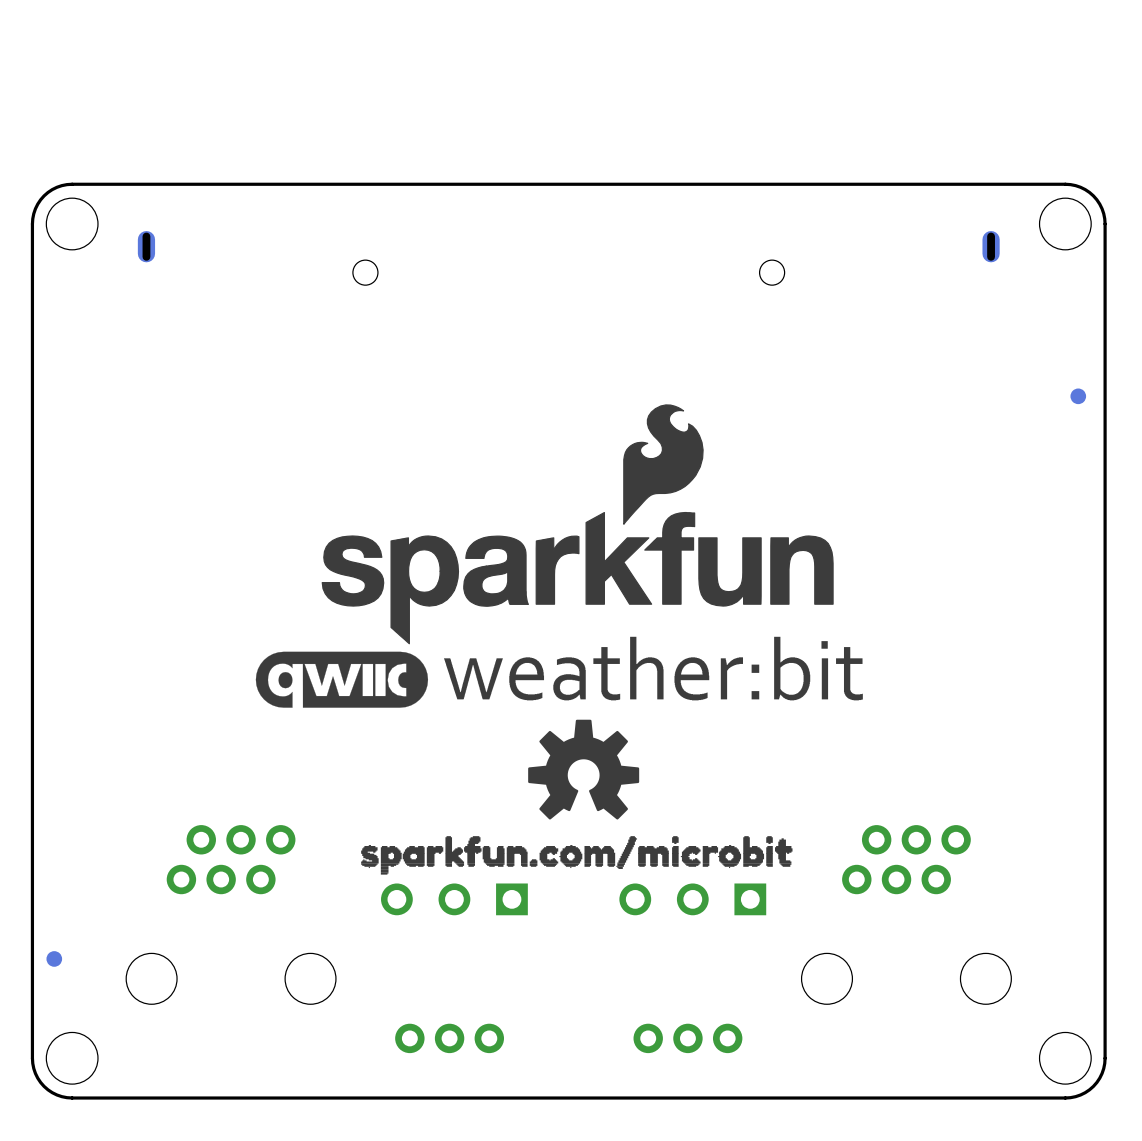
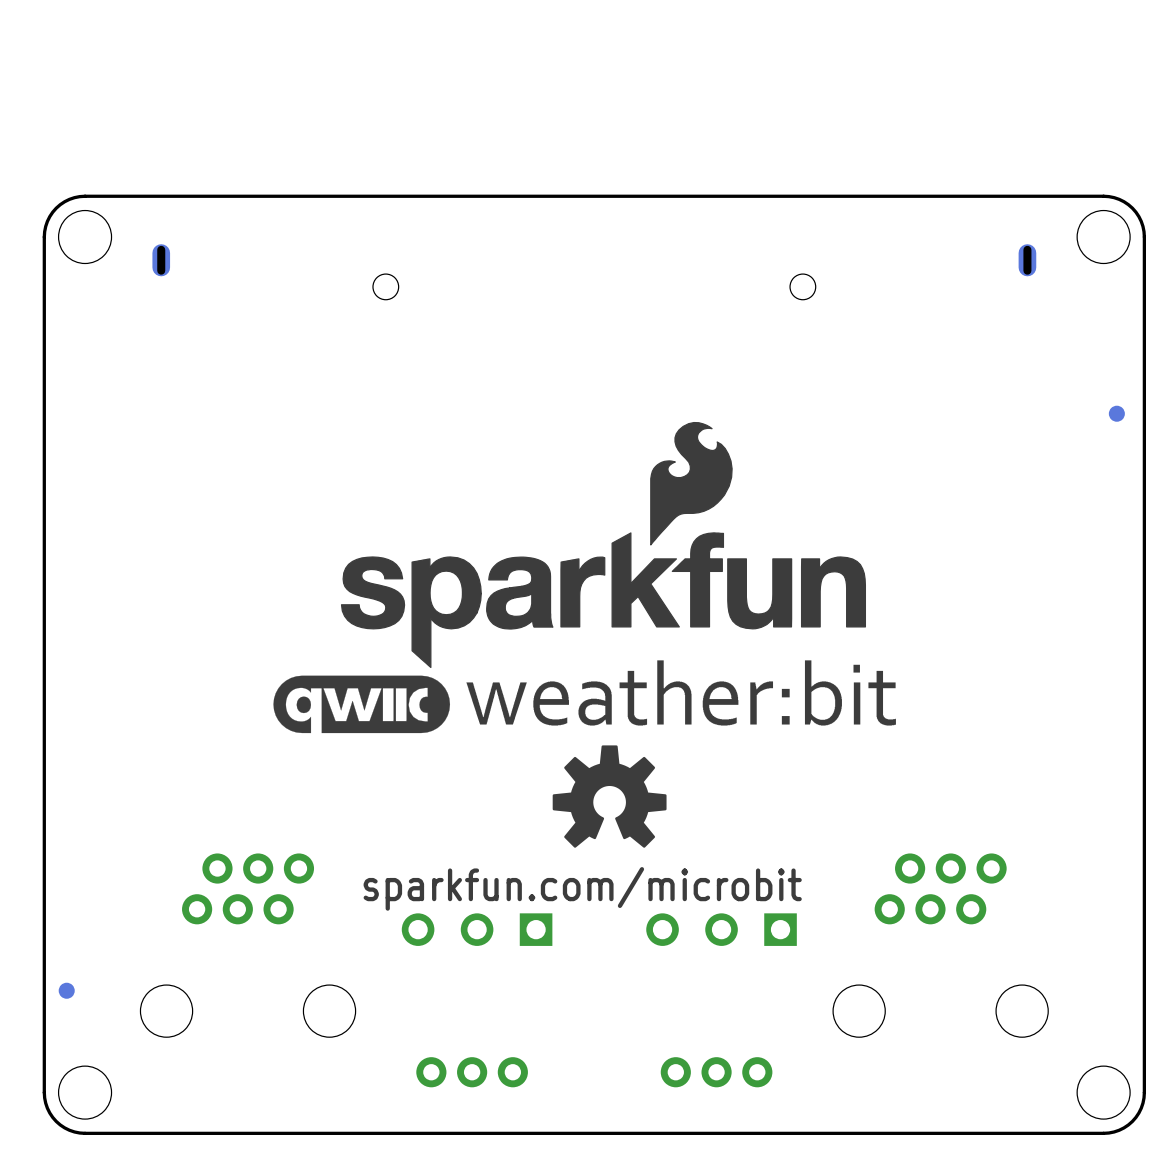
drawing: [361, 836, 793, 875] -> none
text: none -> sparkfun.com/microbit (582, 888)

